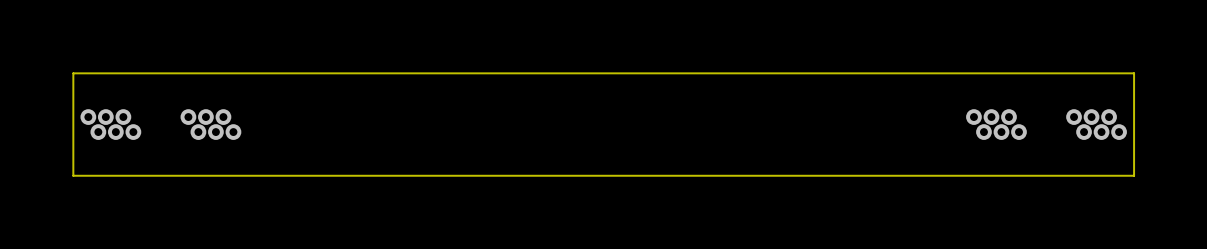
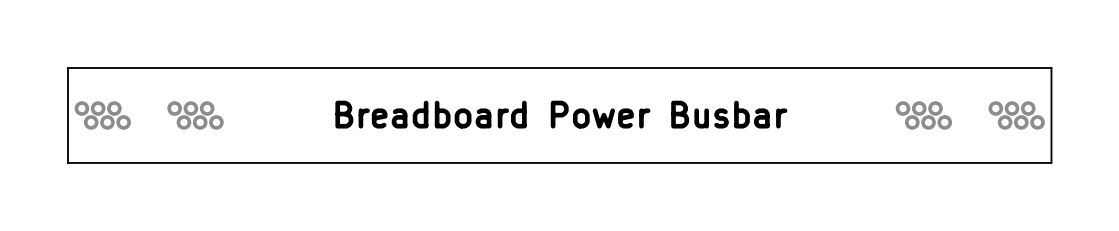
text: none -> Breadboard Power Busbar (561, 114)

